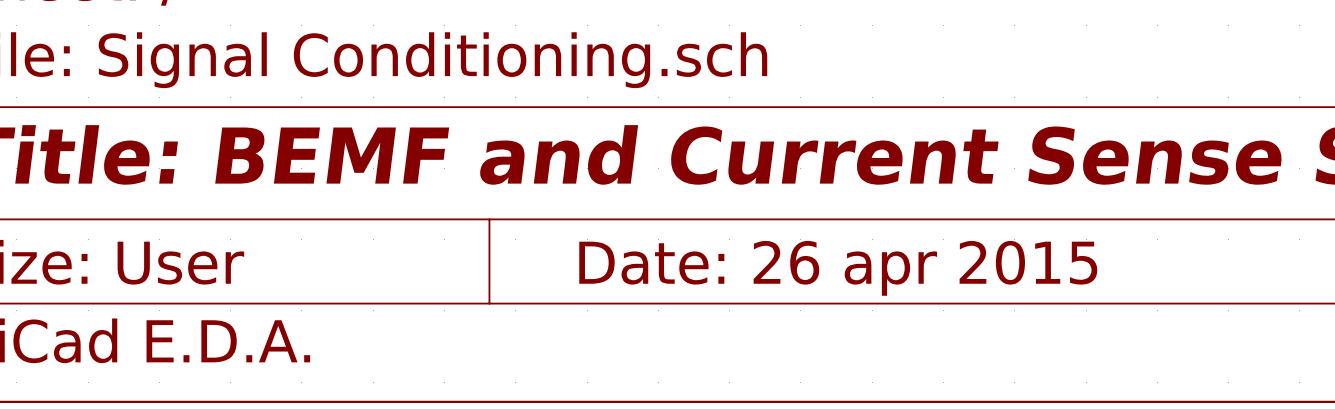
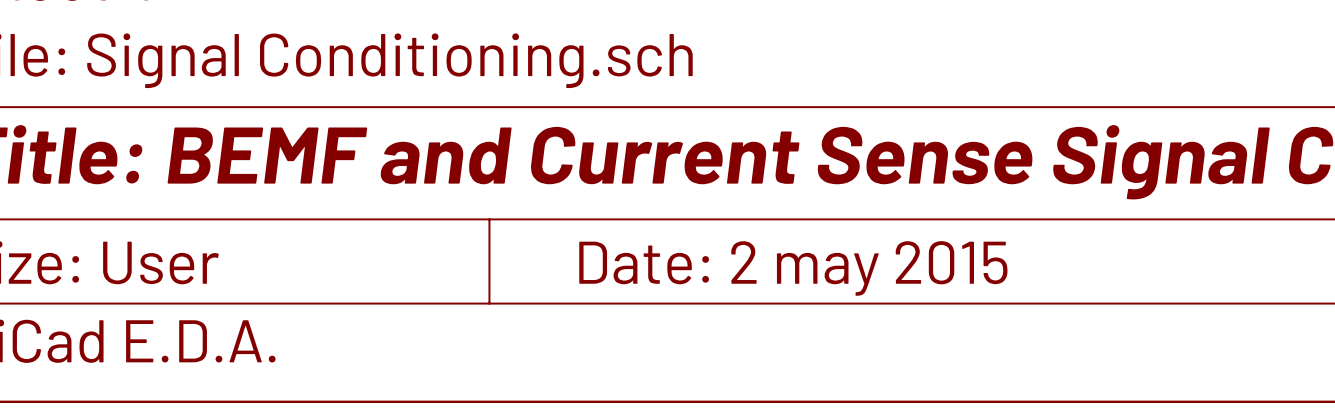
title block: Date: 26 apr 2015 (838, 268) -> Date: 2 may 2015 (793, 268)

